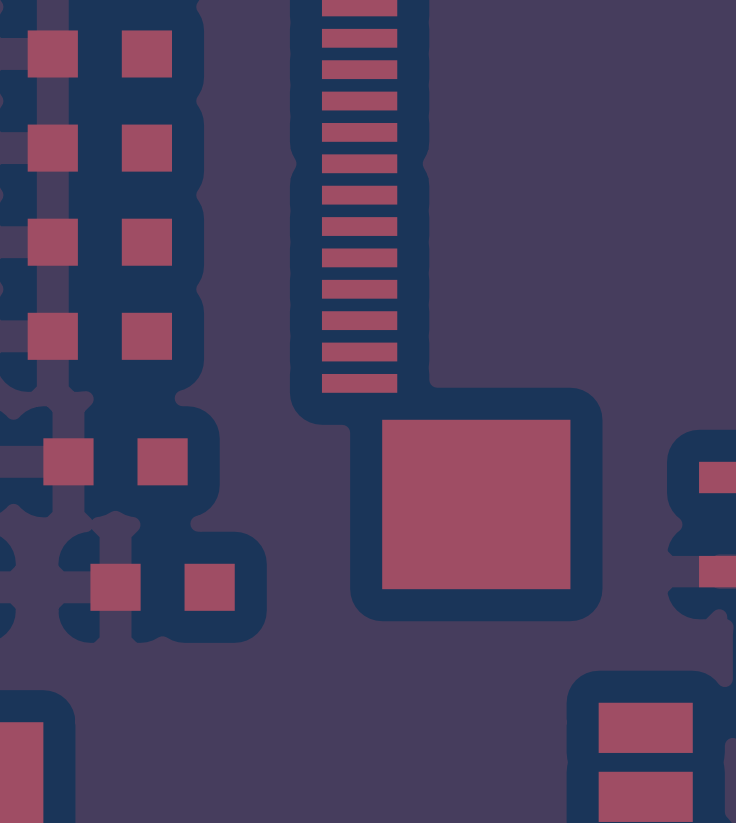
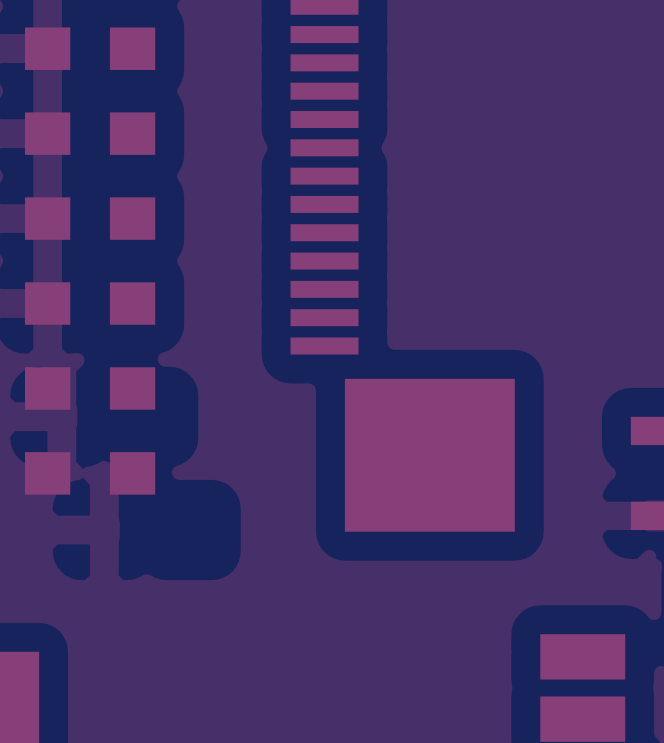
part: none -> (90, 388)
part: (115, 461) -> none
part: none -> (90, 473)
part: (162, 587) -> none

